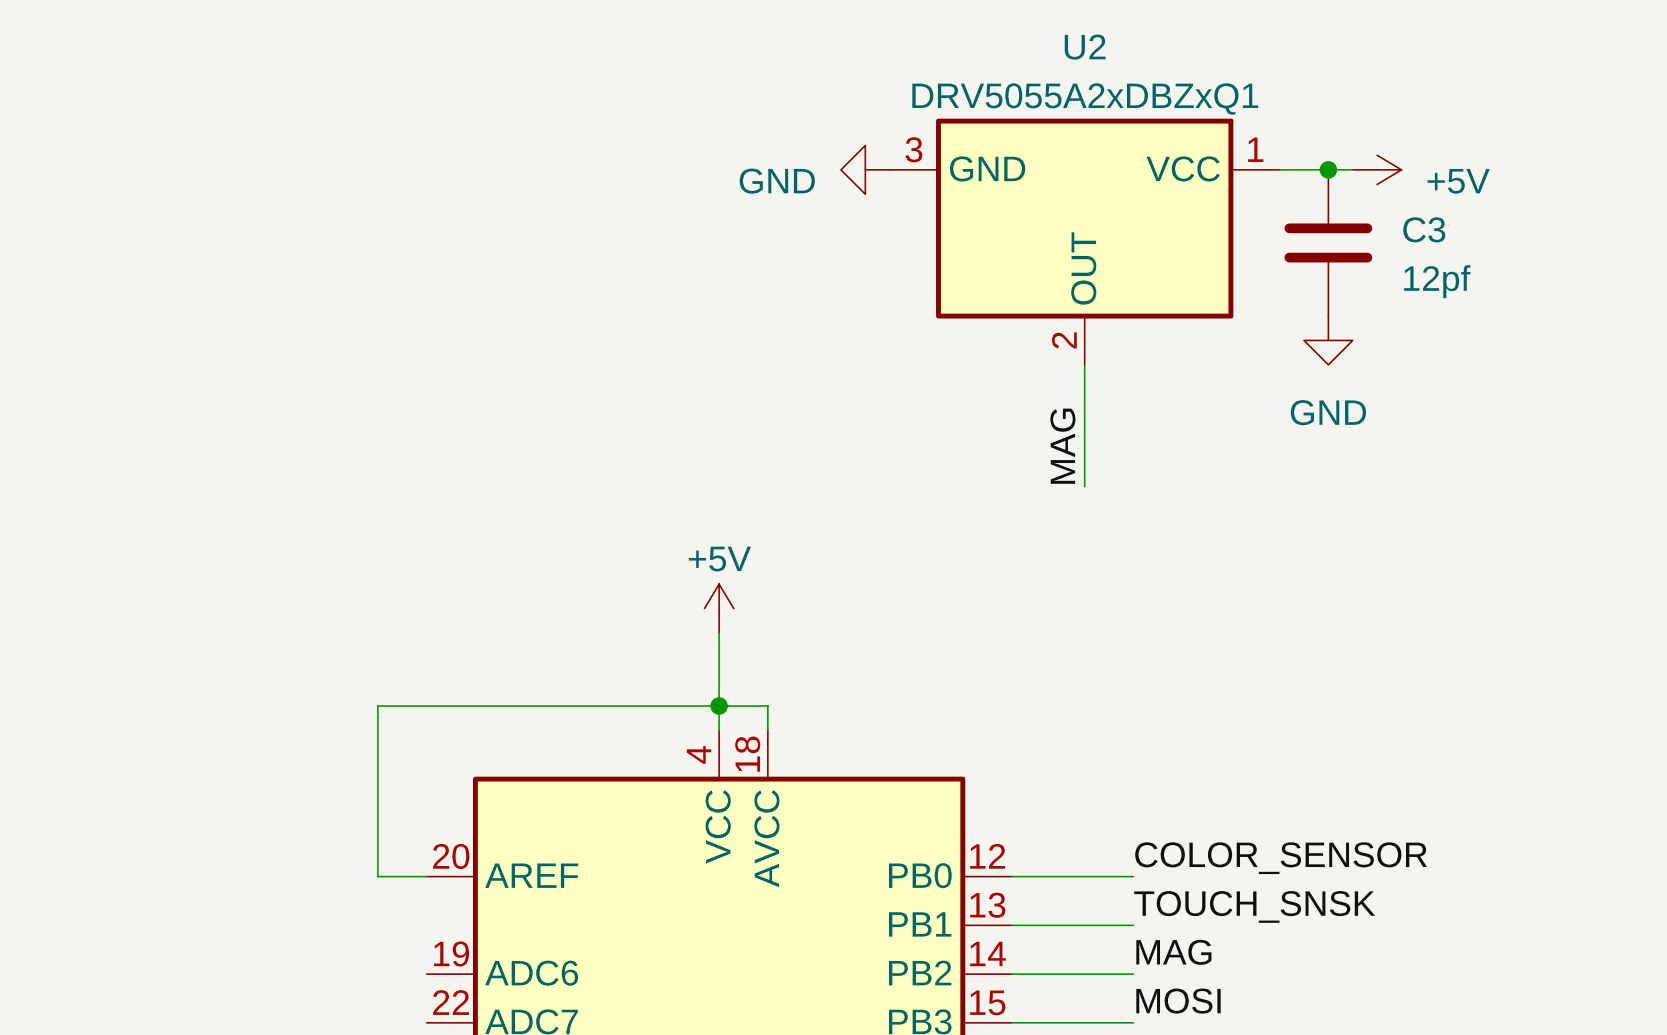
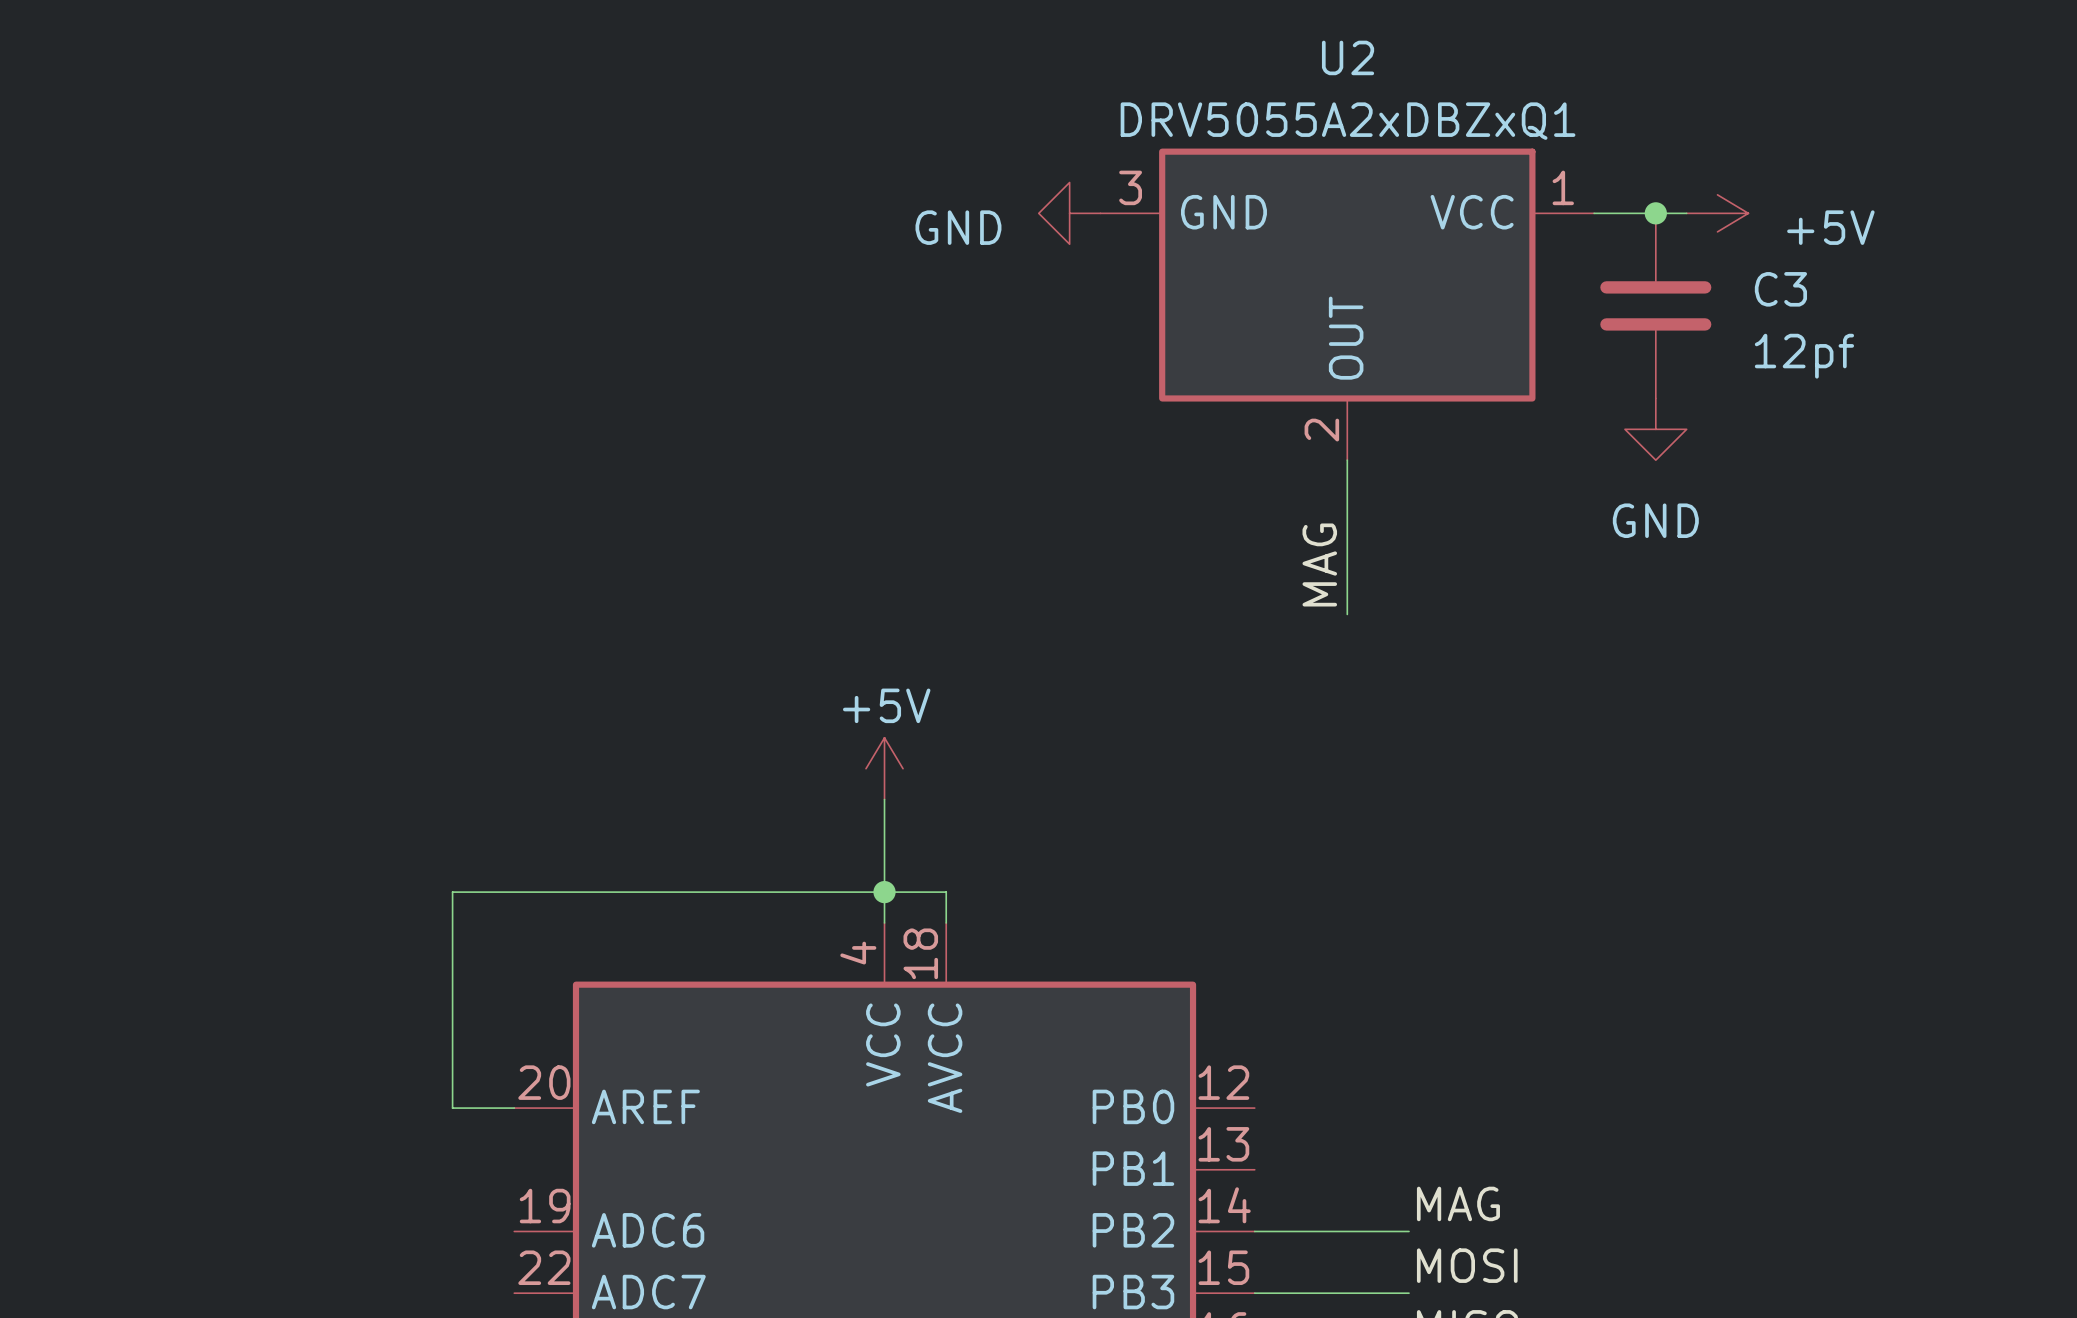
label: COLOR_SENSOR (1281, 858) -> none
wire: (1011, 876) (1133, 876) -> none
label: TOUCH_SNSK (1254, 906) -> none
wire: (1011, 925) (1133, 925) -> none

